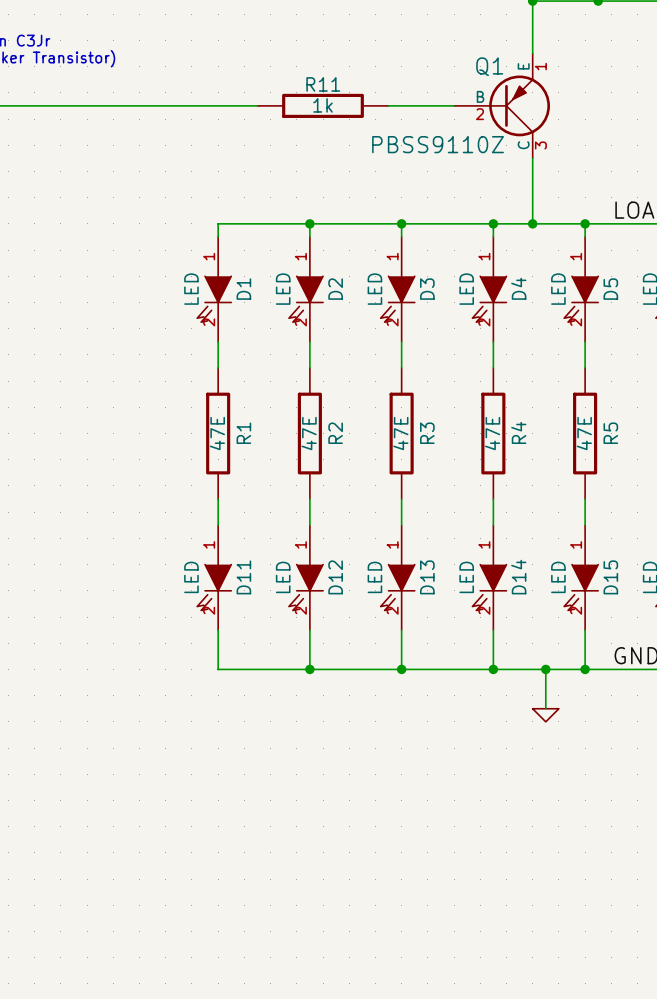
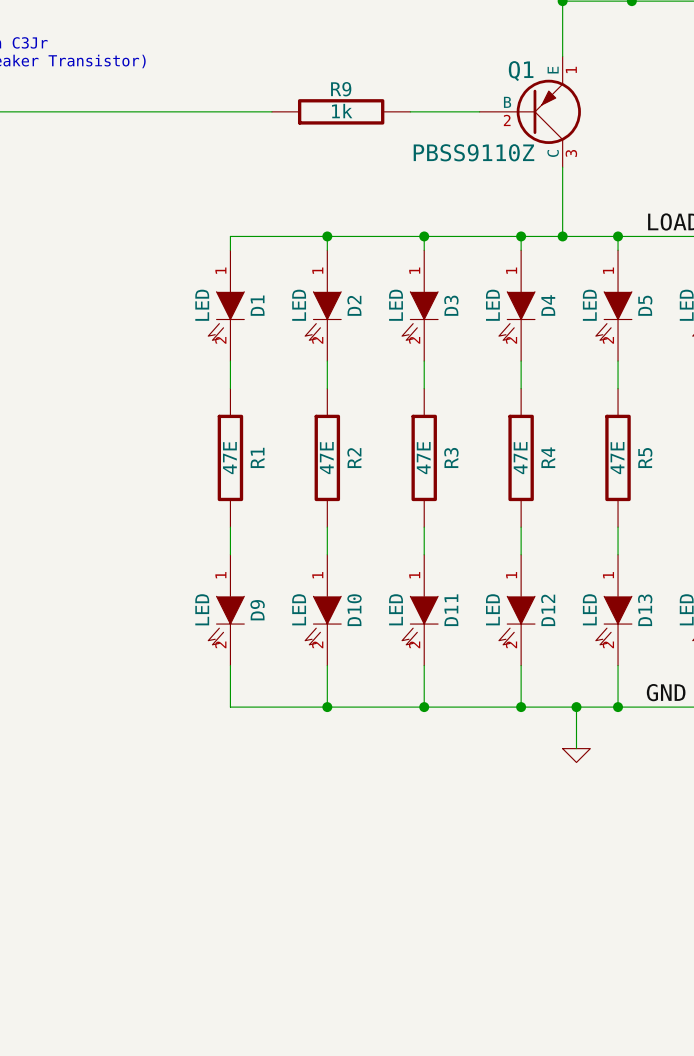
R11 name: R11 (323, 84) -> R9 (341, 89)
D11 name: D11 (243, 577) -> D9 (257, 610)
D12 name: D12 (335, 577) -> D10 (354, 610)
D13 name: D13 (427, 577) -> D11 (451, 610)
D14 name: D14 (518, 577) -> D12 (548, 610)
D15 name: D15 (610, 577) -> D13 (645, 610)

